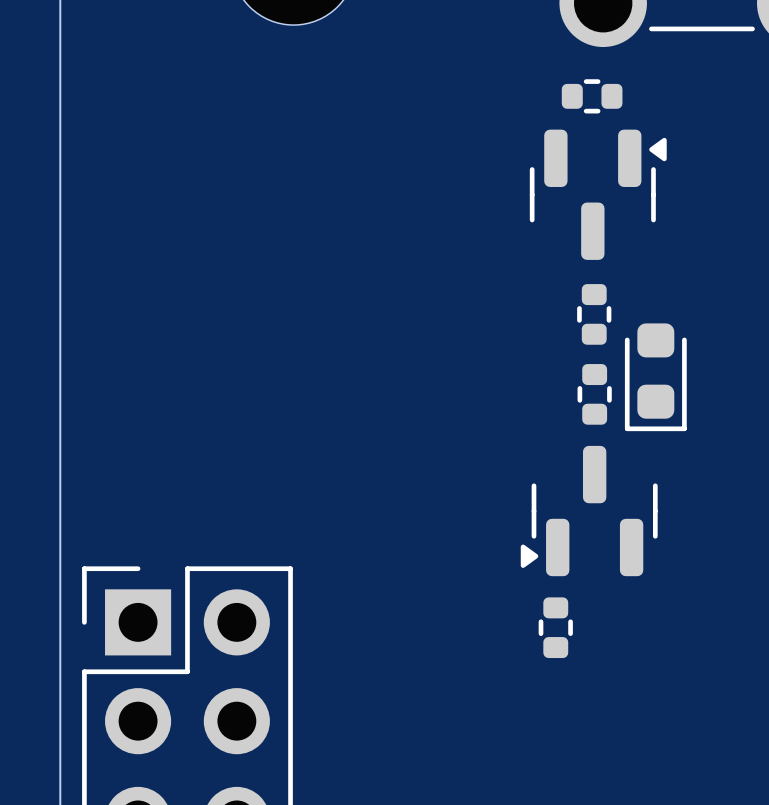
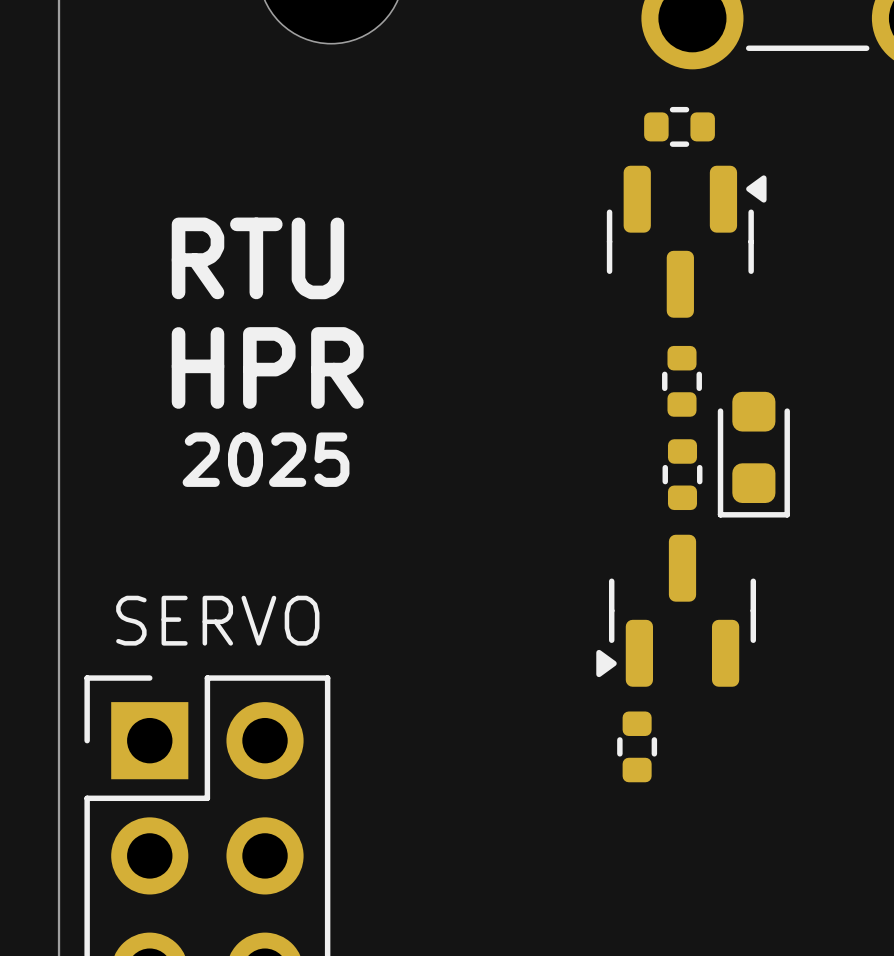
text: none -> RTU (257, 258)
text: none -> HPR (267, 367)
text: none -> 2025 (266, 459)
text: none -> SERVO (217, 620)

